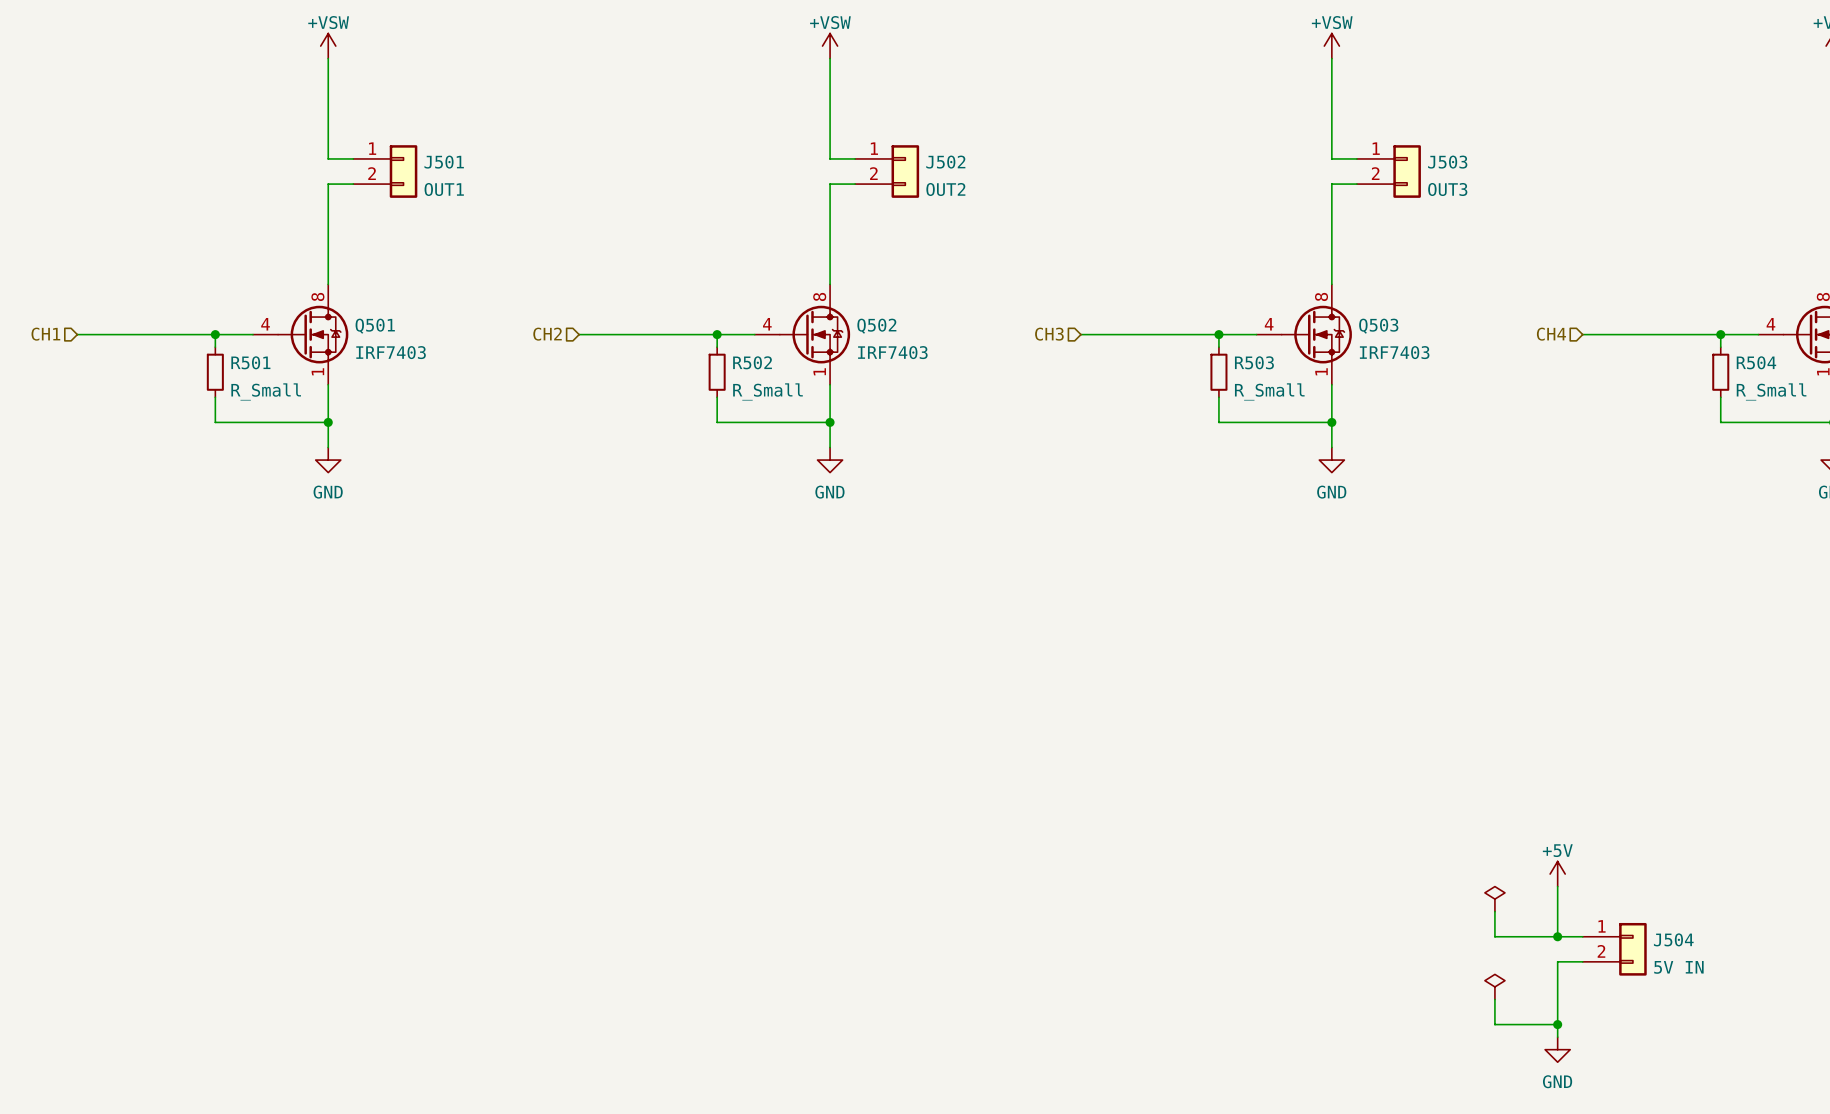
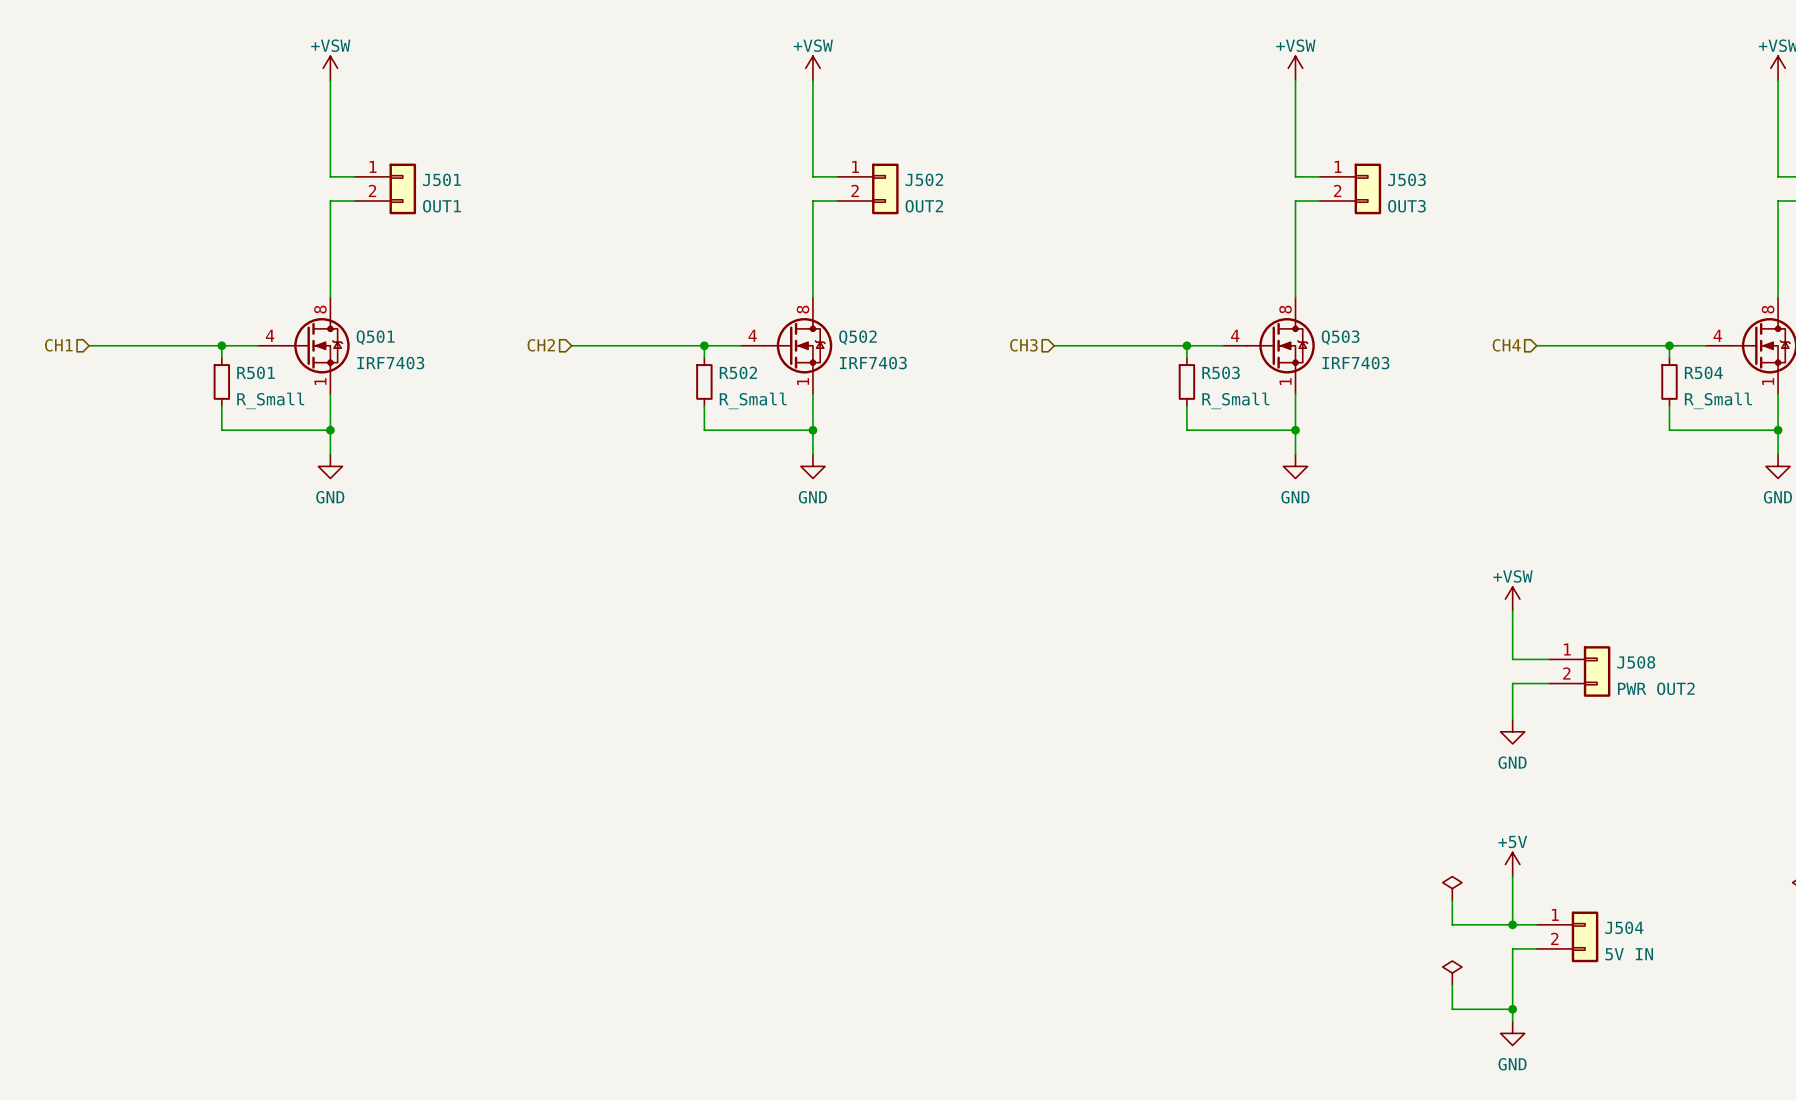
power symbol: none -> +VSW (1512, 599)
wire: none -> (1512, 611) (1512, 659) (1548, 659)
J508: none -> PWR OUT2 (1579, 671)
wire: none -> (1548, 683) (1512, 683) (1512, 719)
power symbol: none -> GND (1512, 731)

